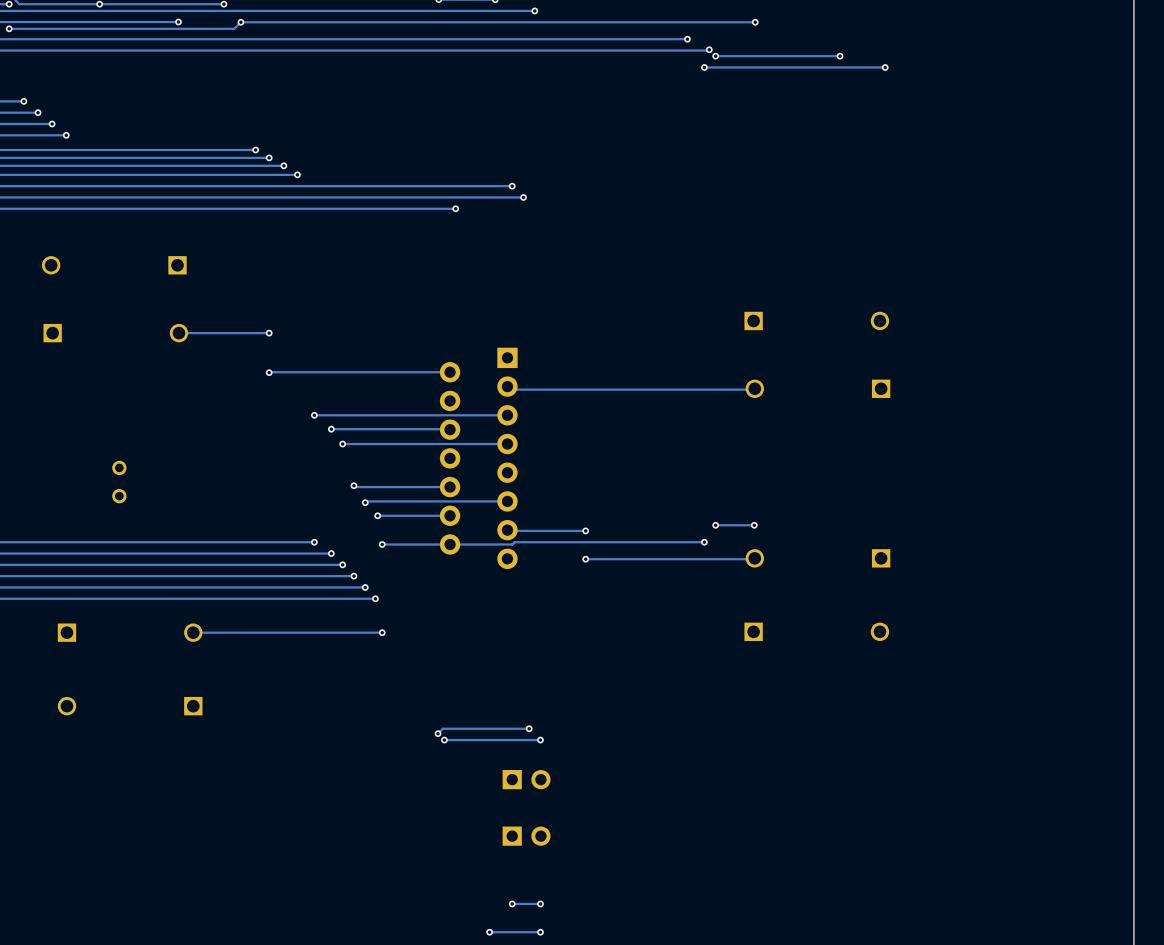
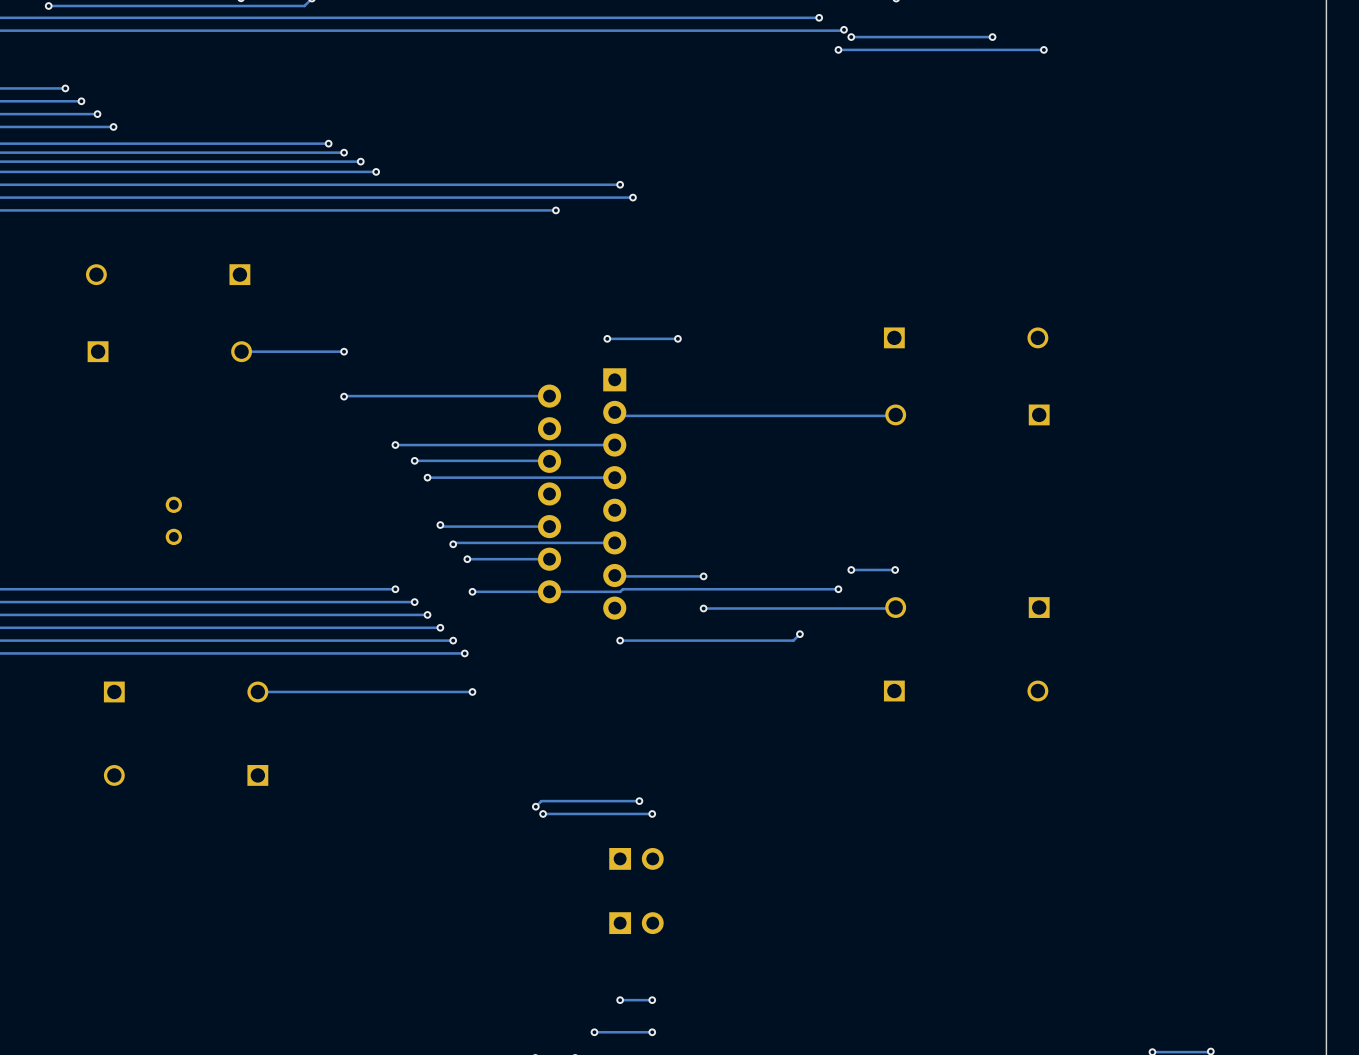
via: none -> (607, 338)
track: none -> (677, 338) (607, 338)
via: none -> (677, 338)
track: none -> (799, 634) (793, 640) (620, 640)
via: none -> (799, 634)
via: none -> (620, 640)

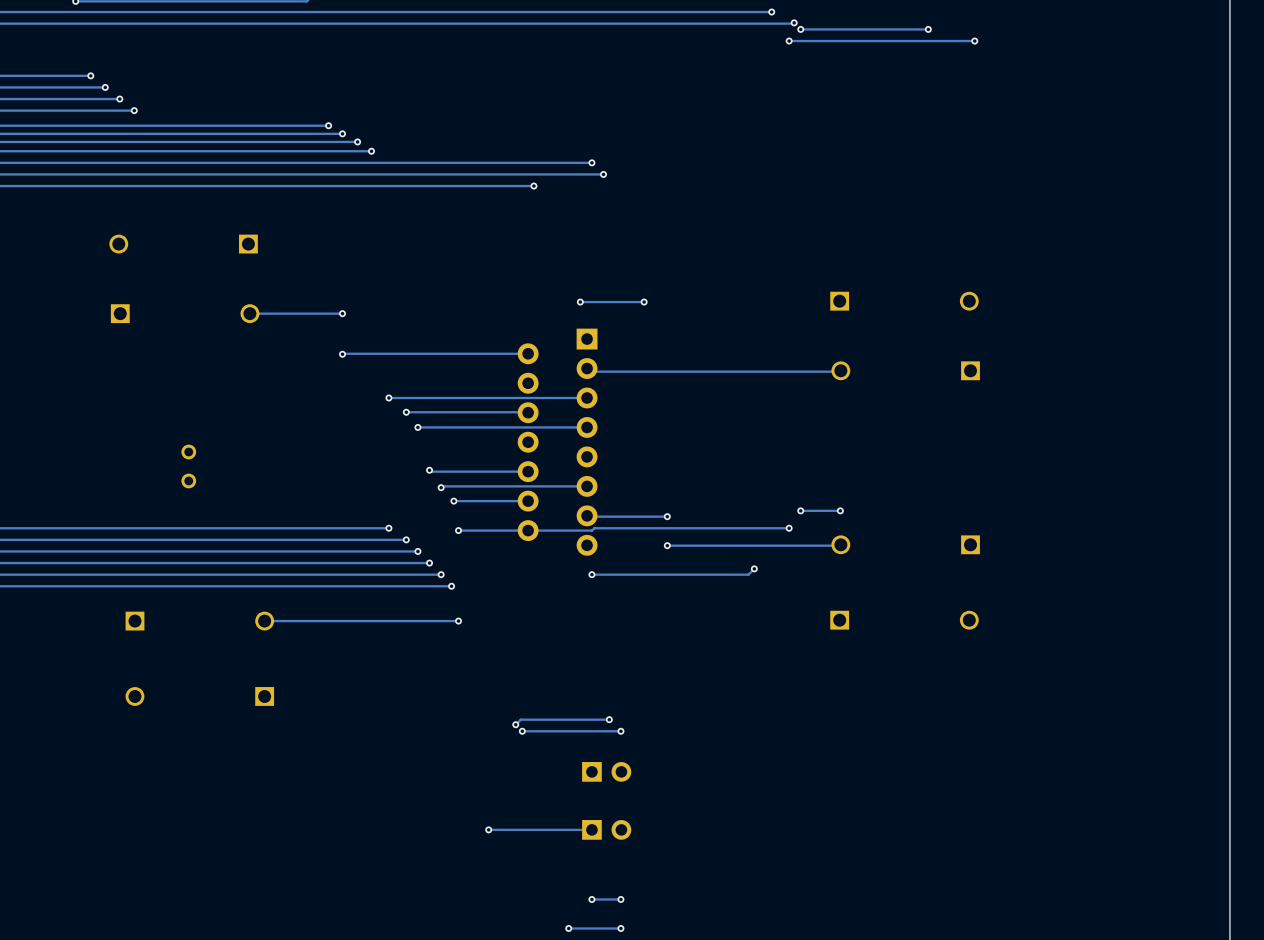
via: none -> (488, 829)
track: none -> (591, 829) (488, 829)

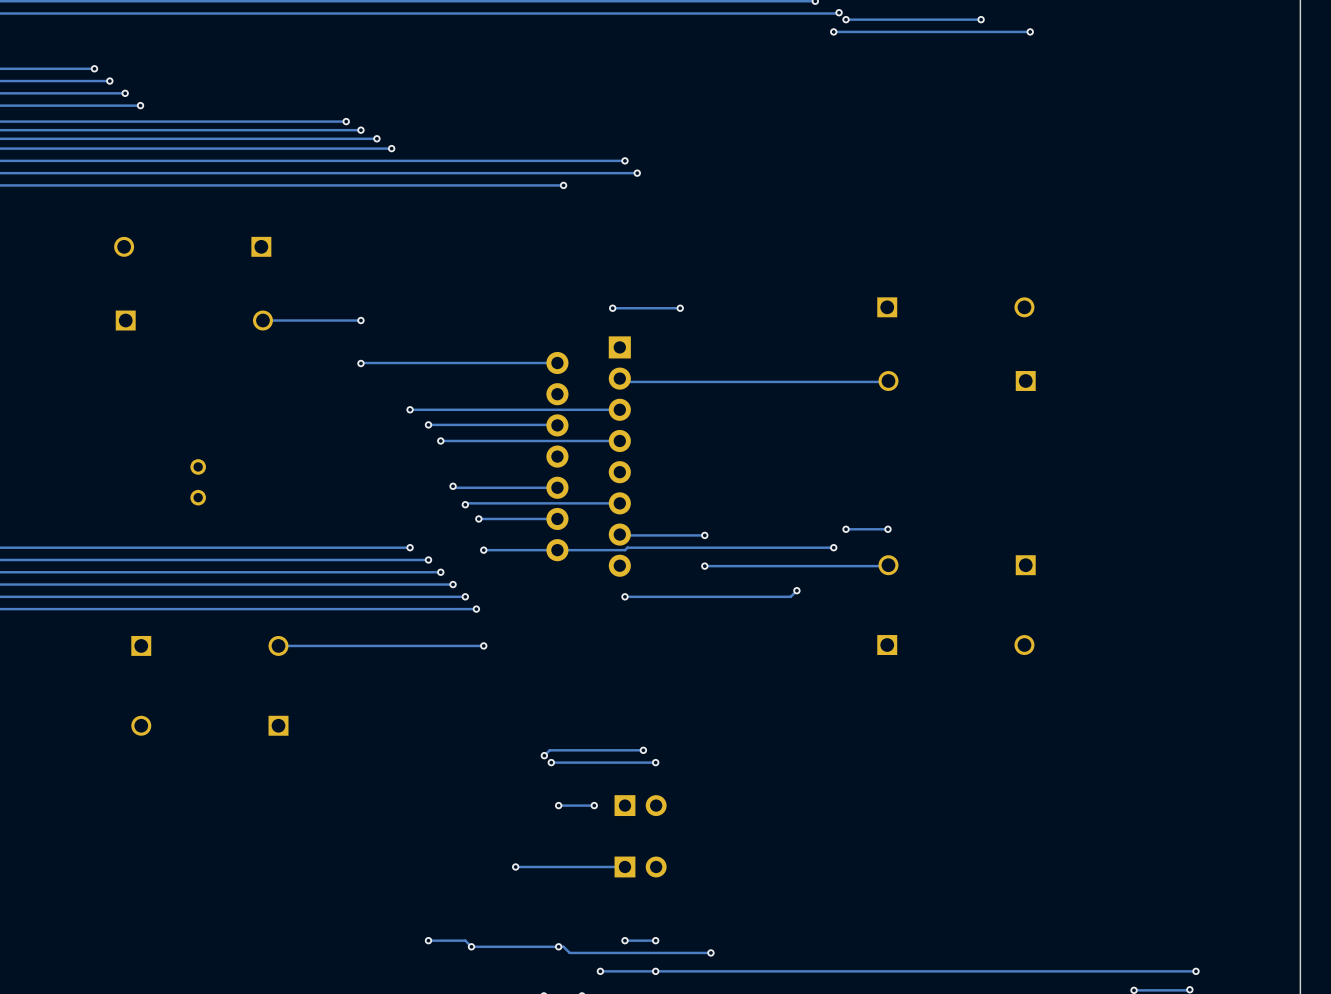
via: none -> (558, 805)
track: none -> (594, 805) (558, 805)
via: none -> (594, 805)
track: none -> (428, 940) (465, 940) (471, 946) (563, 946) (569, 952) (710, 952)
via: none -> (428, 940)
via: none -> (471, 946)
via: none -> (558, 946)
via: none -> (710, 952)
track: none -> (1196, 971) (655, 971)
via: none -> (1196, 971)

